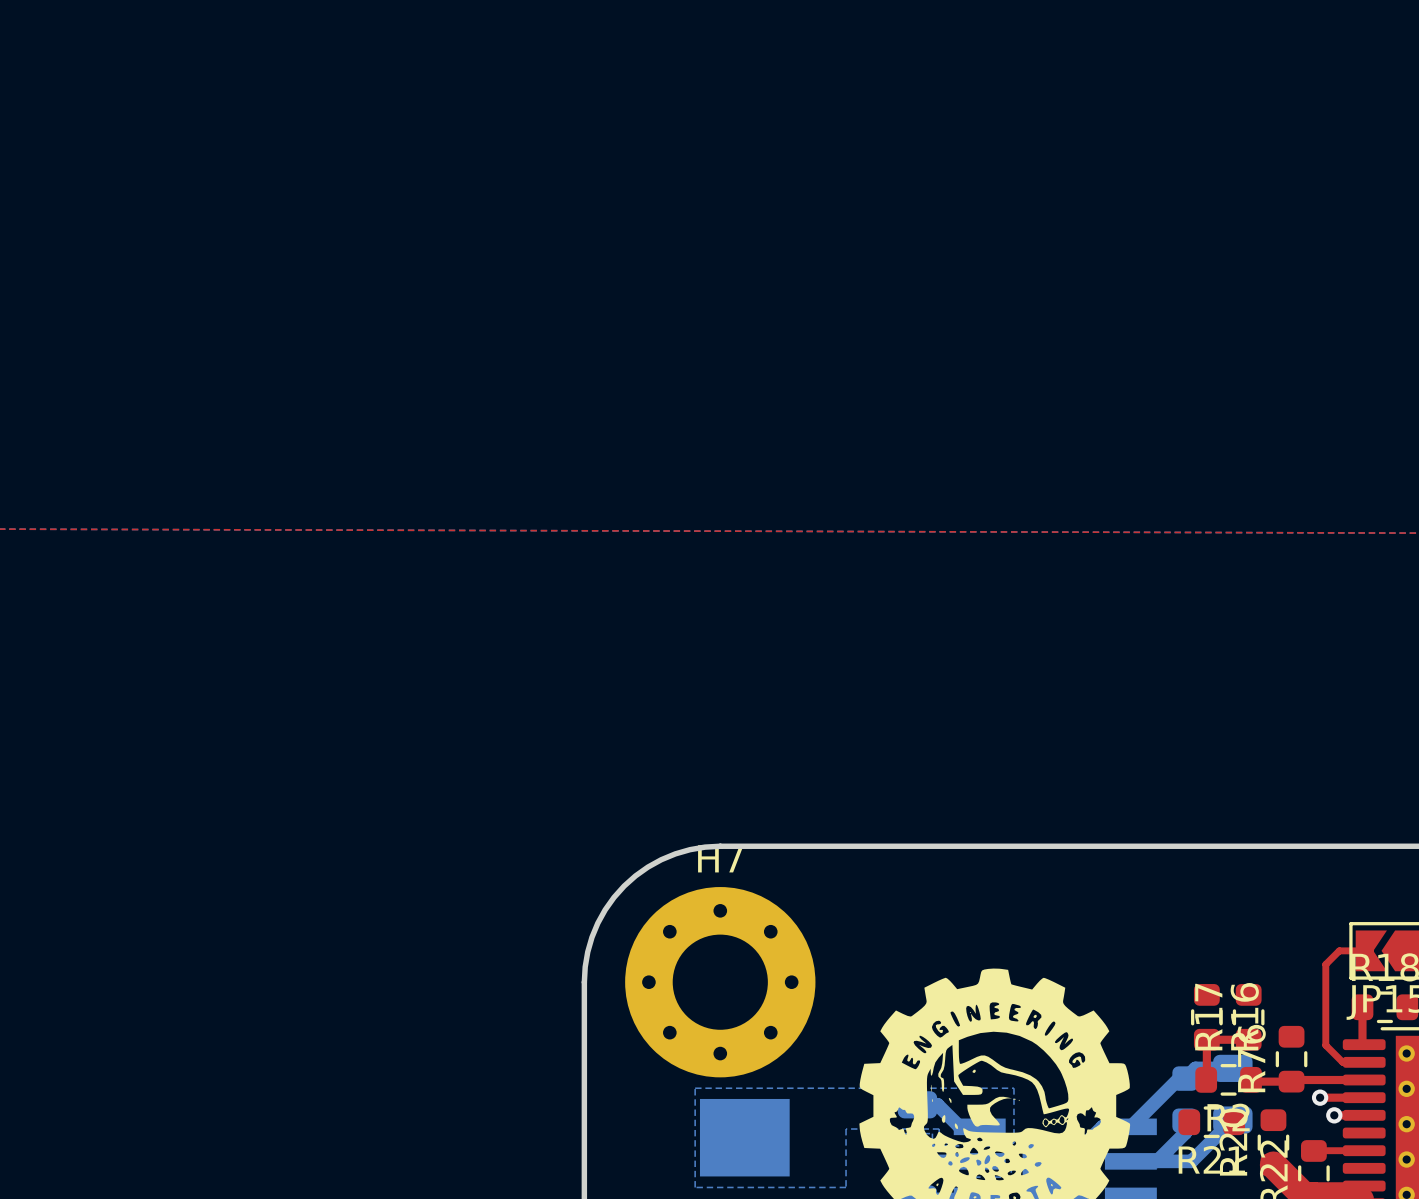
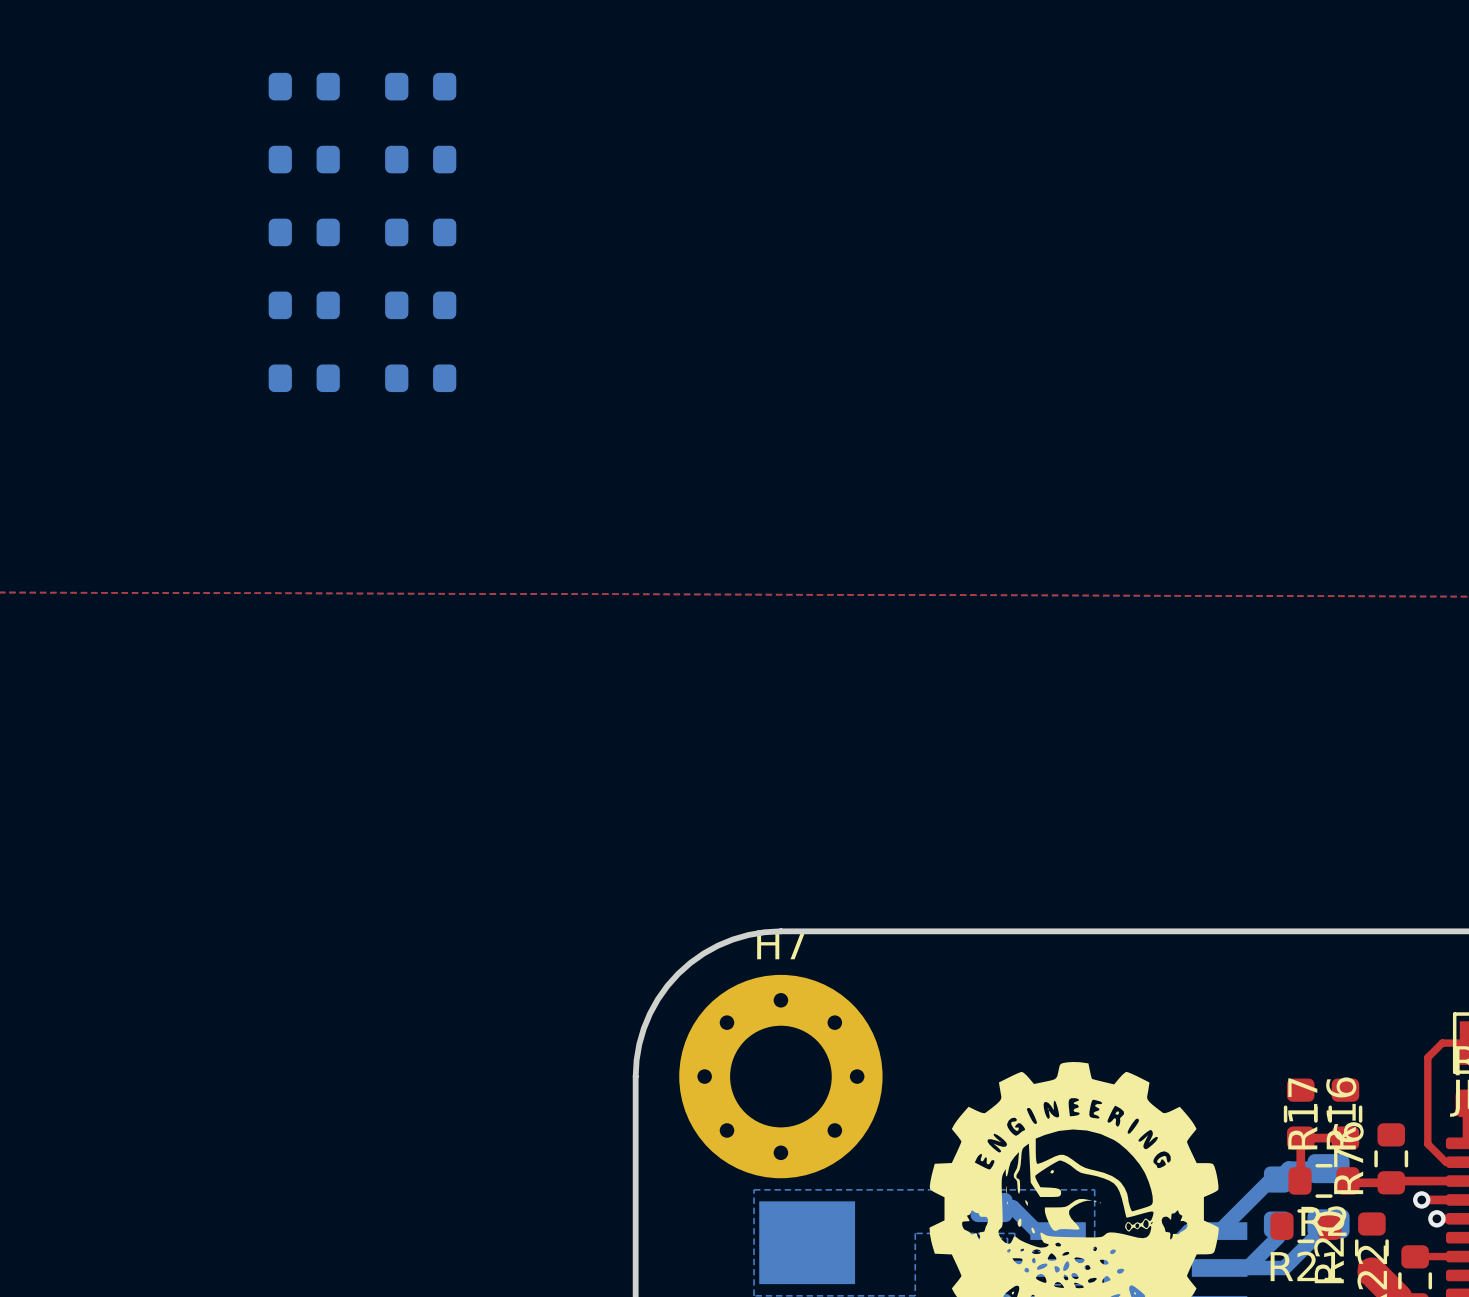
part: none -> (304, 86)
part: none -> (420, 86)
part: none -> (304, 159)
part: none -> (420, 159)
part: none -> (304, 232)
part: none -> (420, 232)
part: none -> (304, 305)
part: none -> (420, 305)
part: none -> (304, 378)
part: none -> (420, 378)

